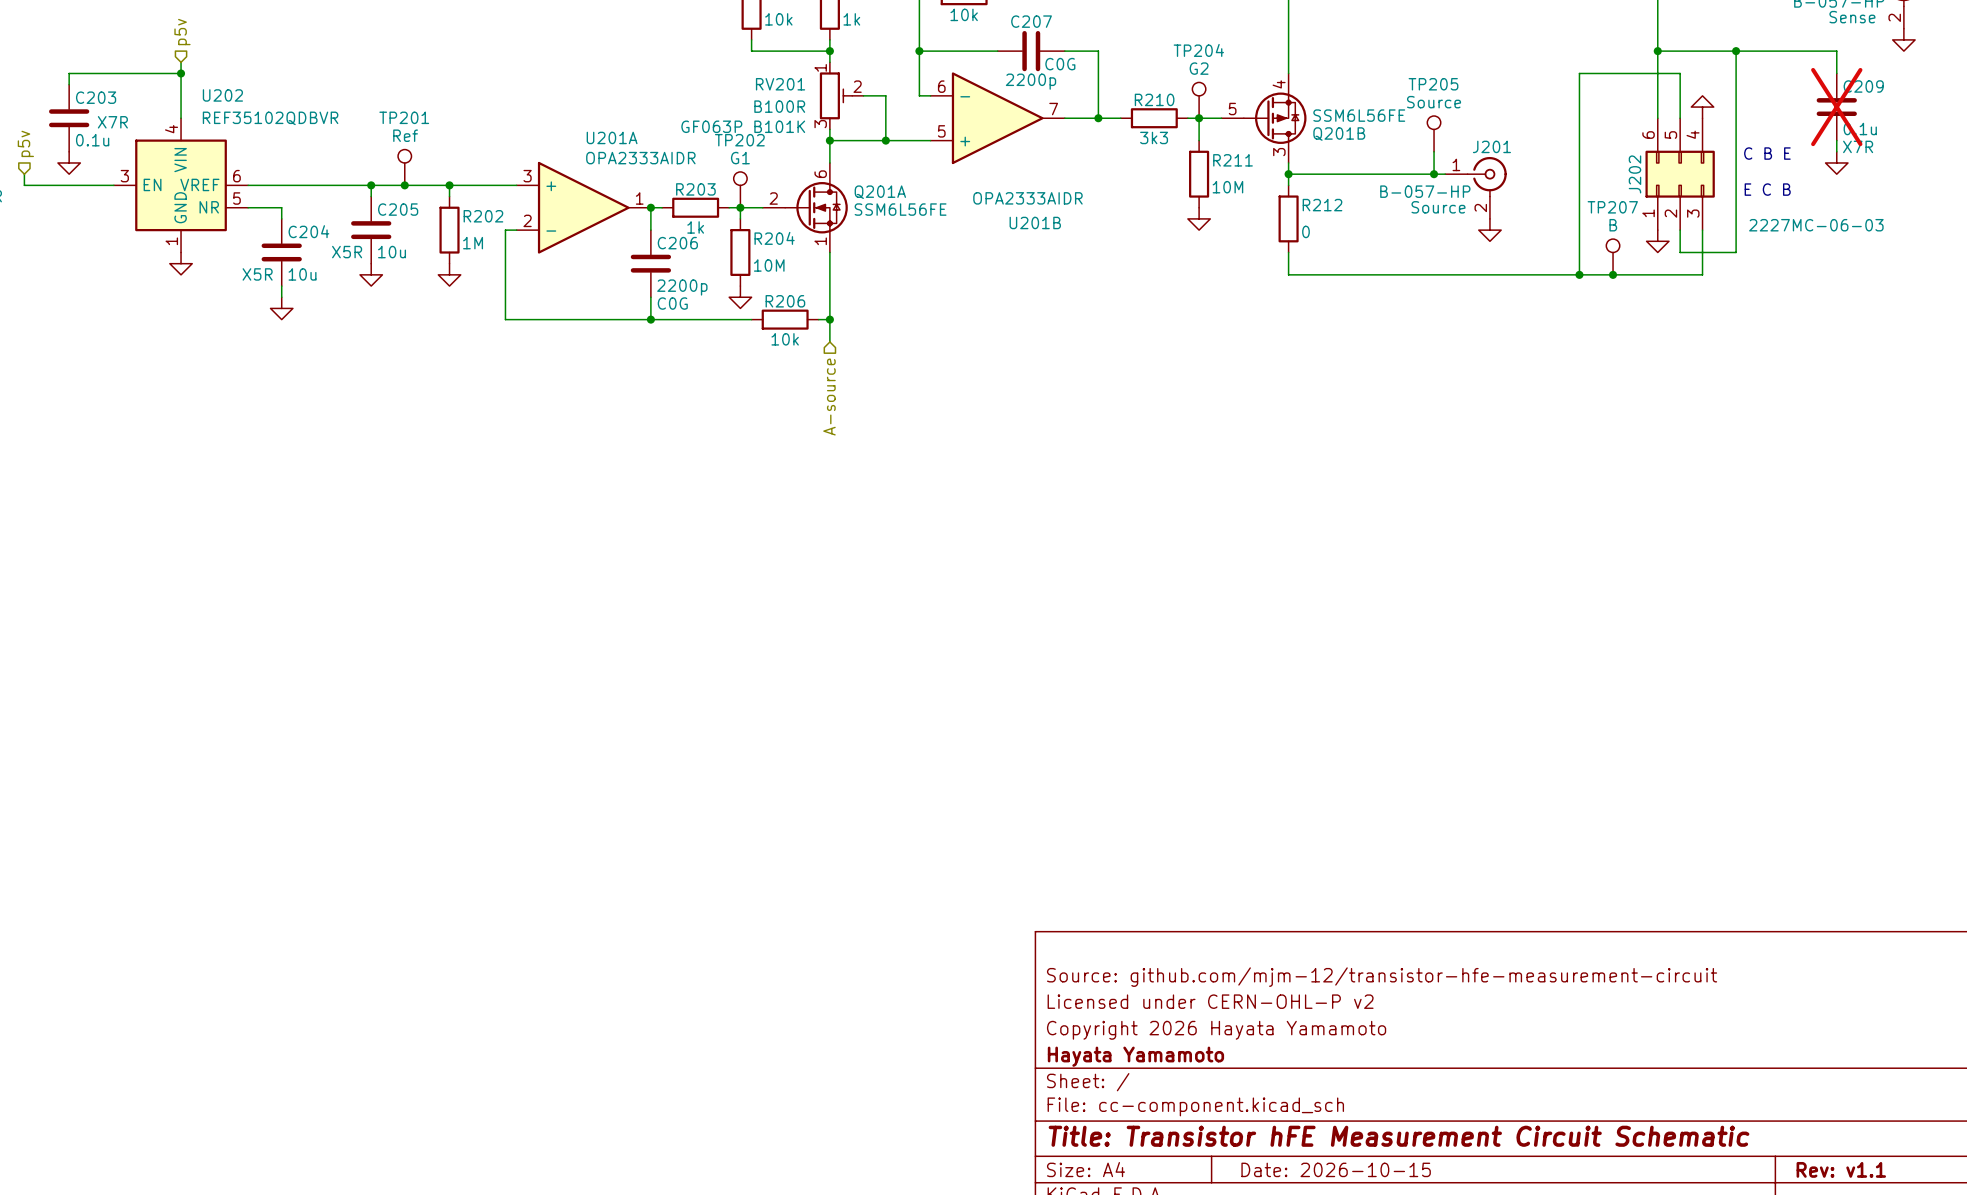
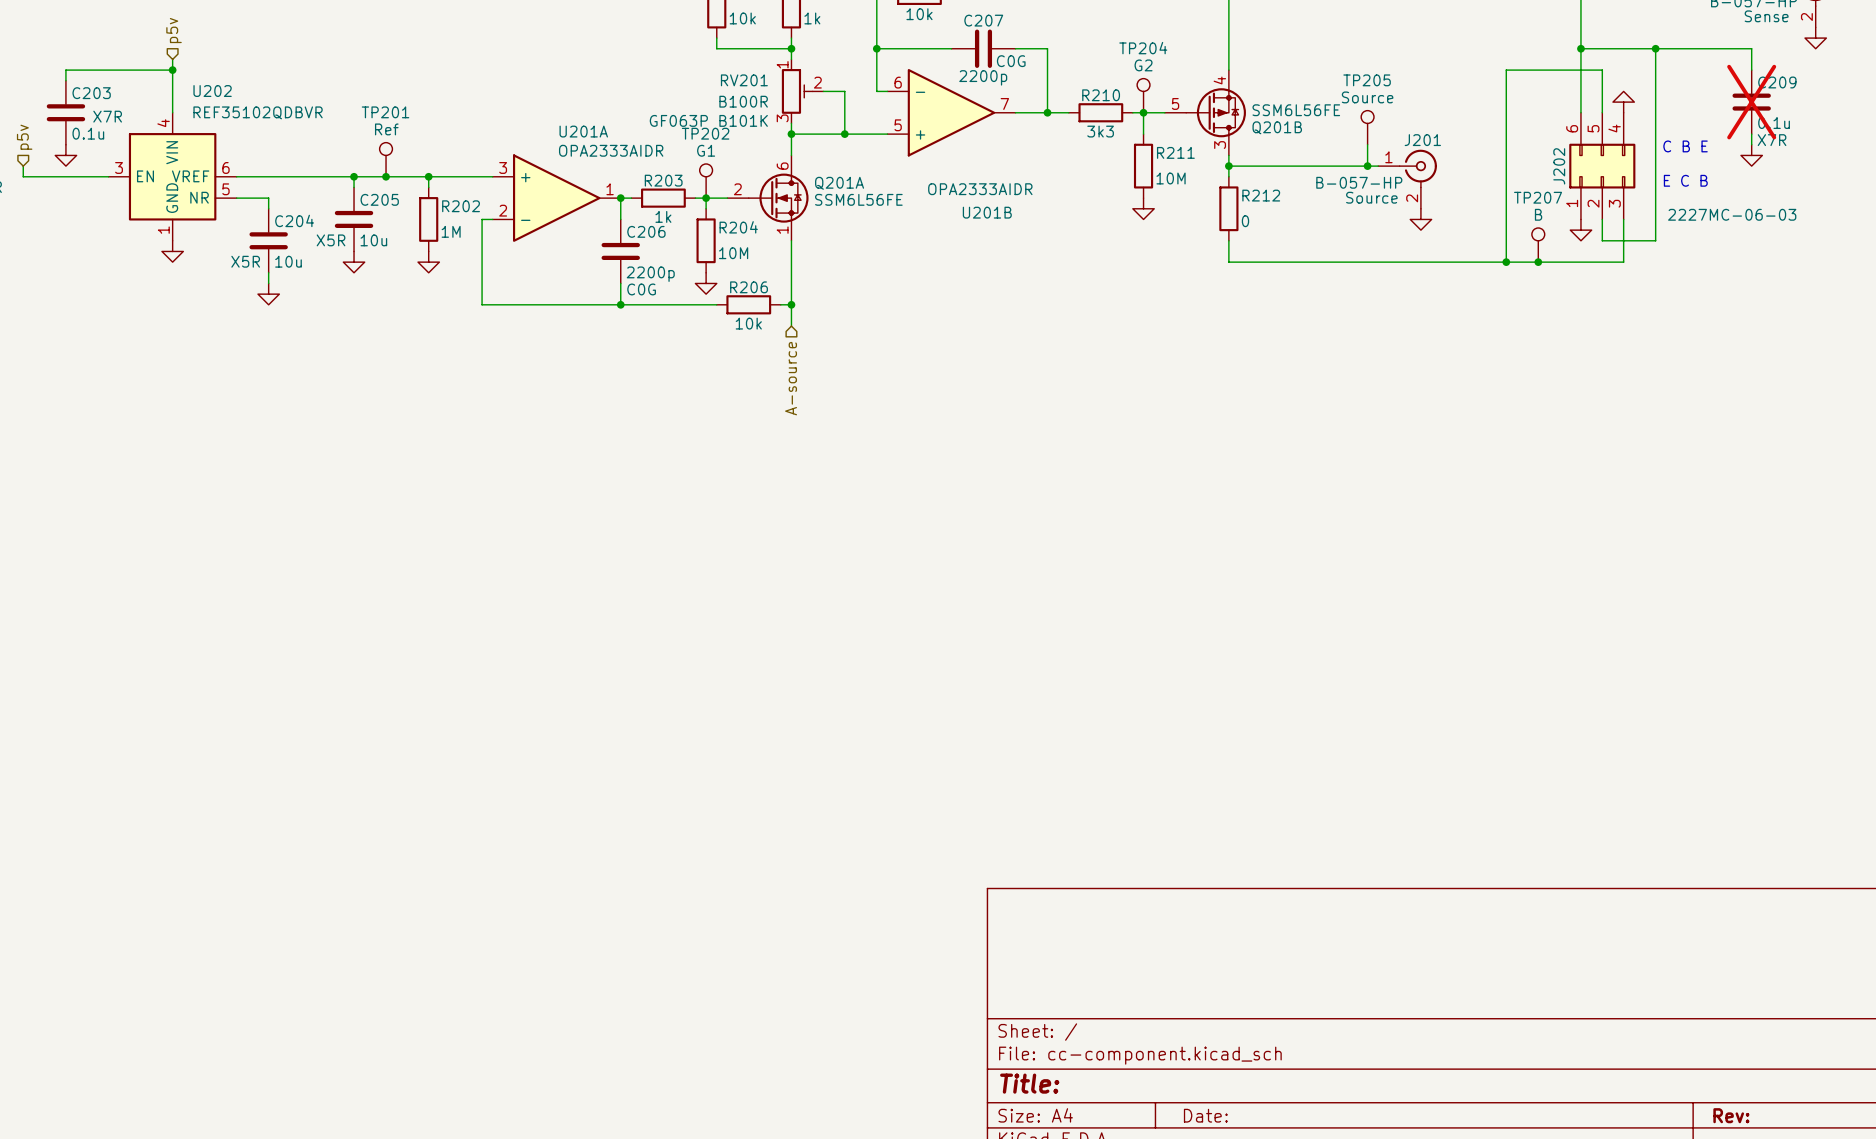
title block: Source: github.com/mjm-12/transistor-hfe-measurement-circuit (1382, 977) -> none
title block: Licensed under CERN-OHL-P v2 (1210, 1001) -> none
title block: Copyright 2026 Hayata Yamamoto (1216, 1030) -> none
title block: Hayata Yamamoto (1135, 1056) -> none
title block: Title: Transistor hFE Measurement Circuit Schematic (1399, 1136) -> Title: (1029, 1083)
title block: Date: 2026-10-15 (1336, 1169) -> Date: (1205, 1115)
title block: Rev: v1.1 (1841, 1169) -> Rev: (1731, 1115)

